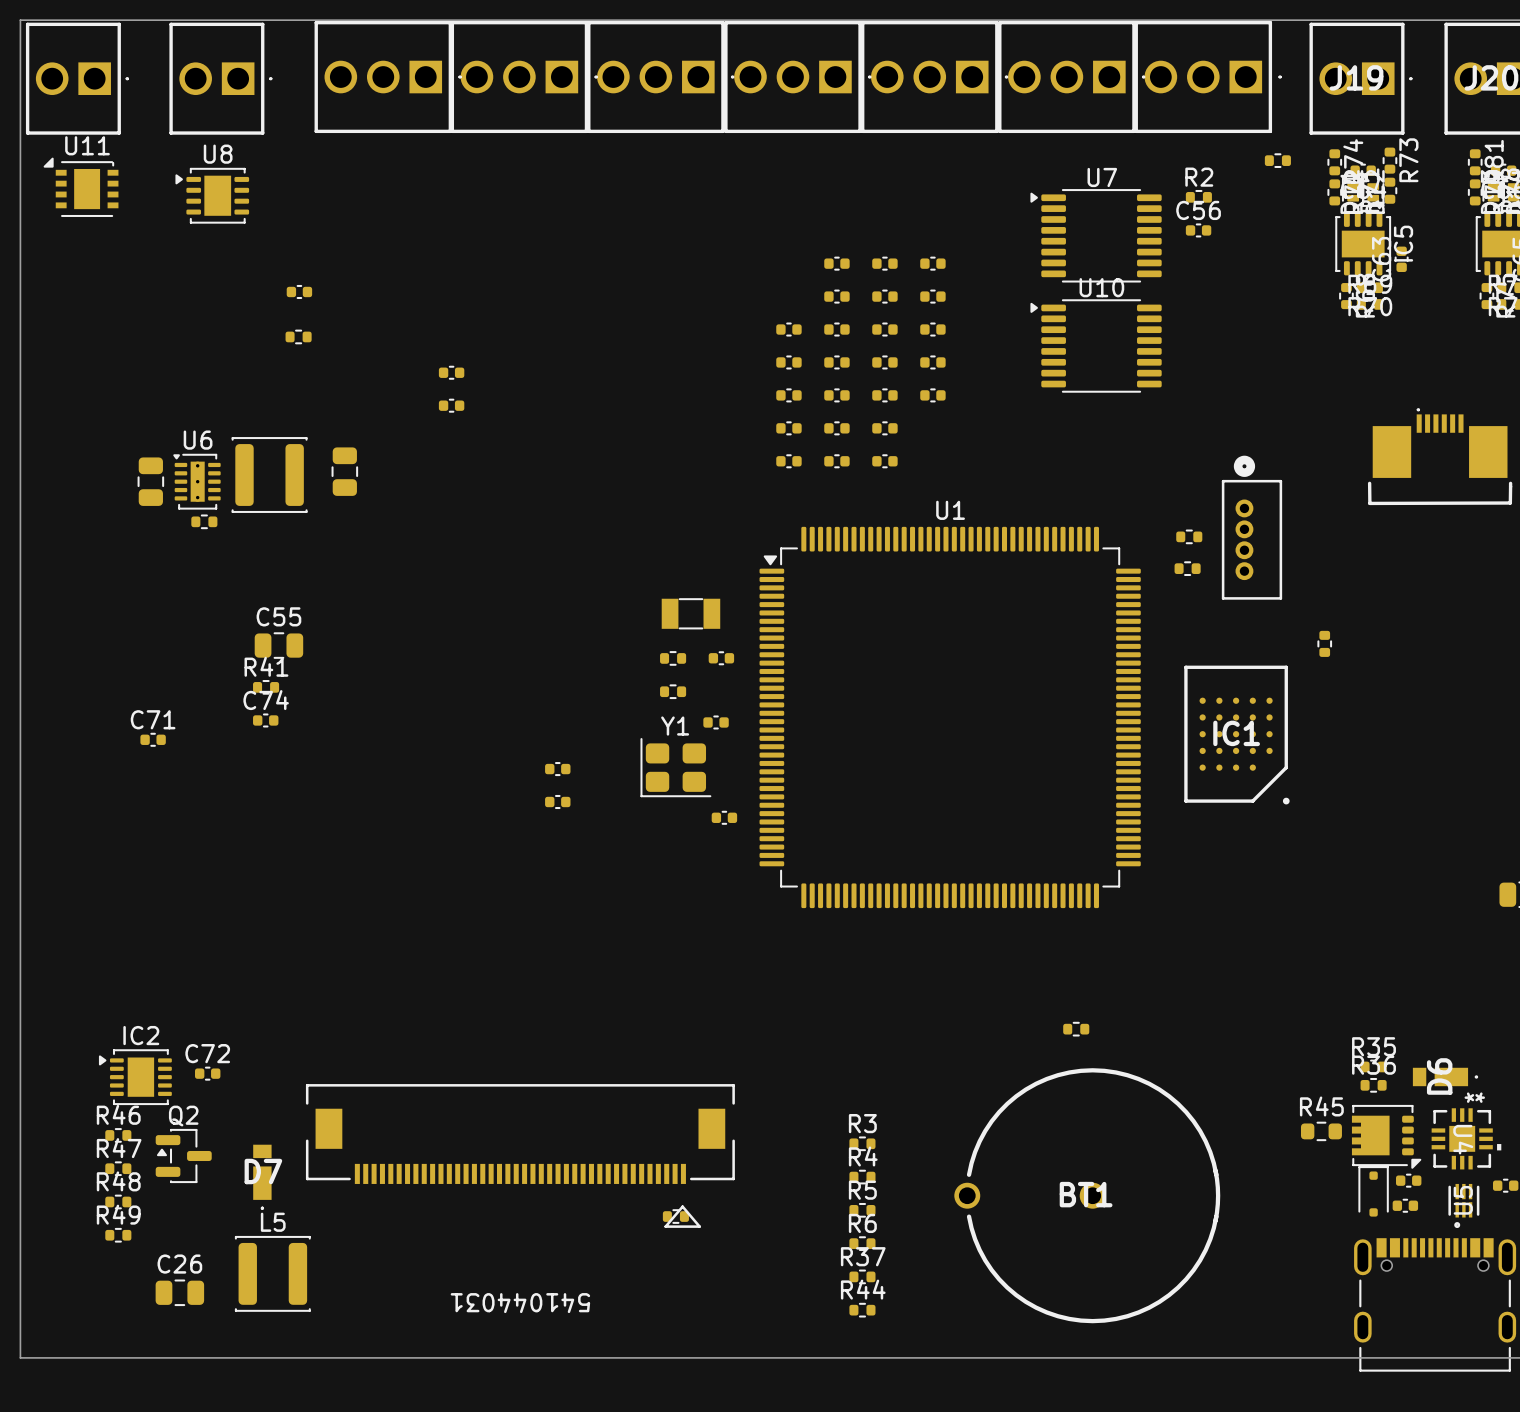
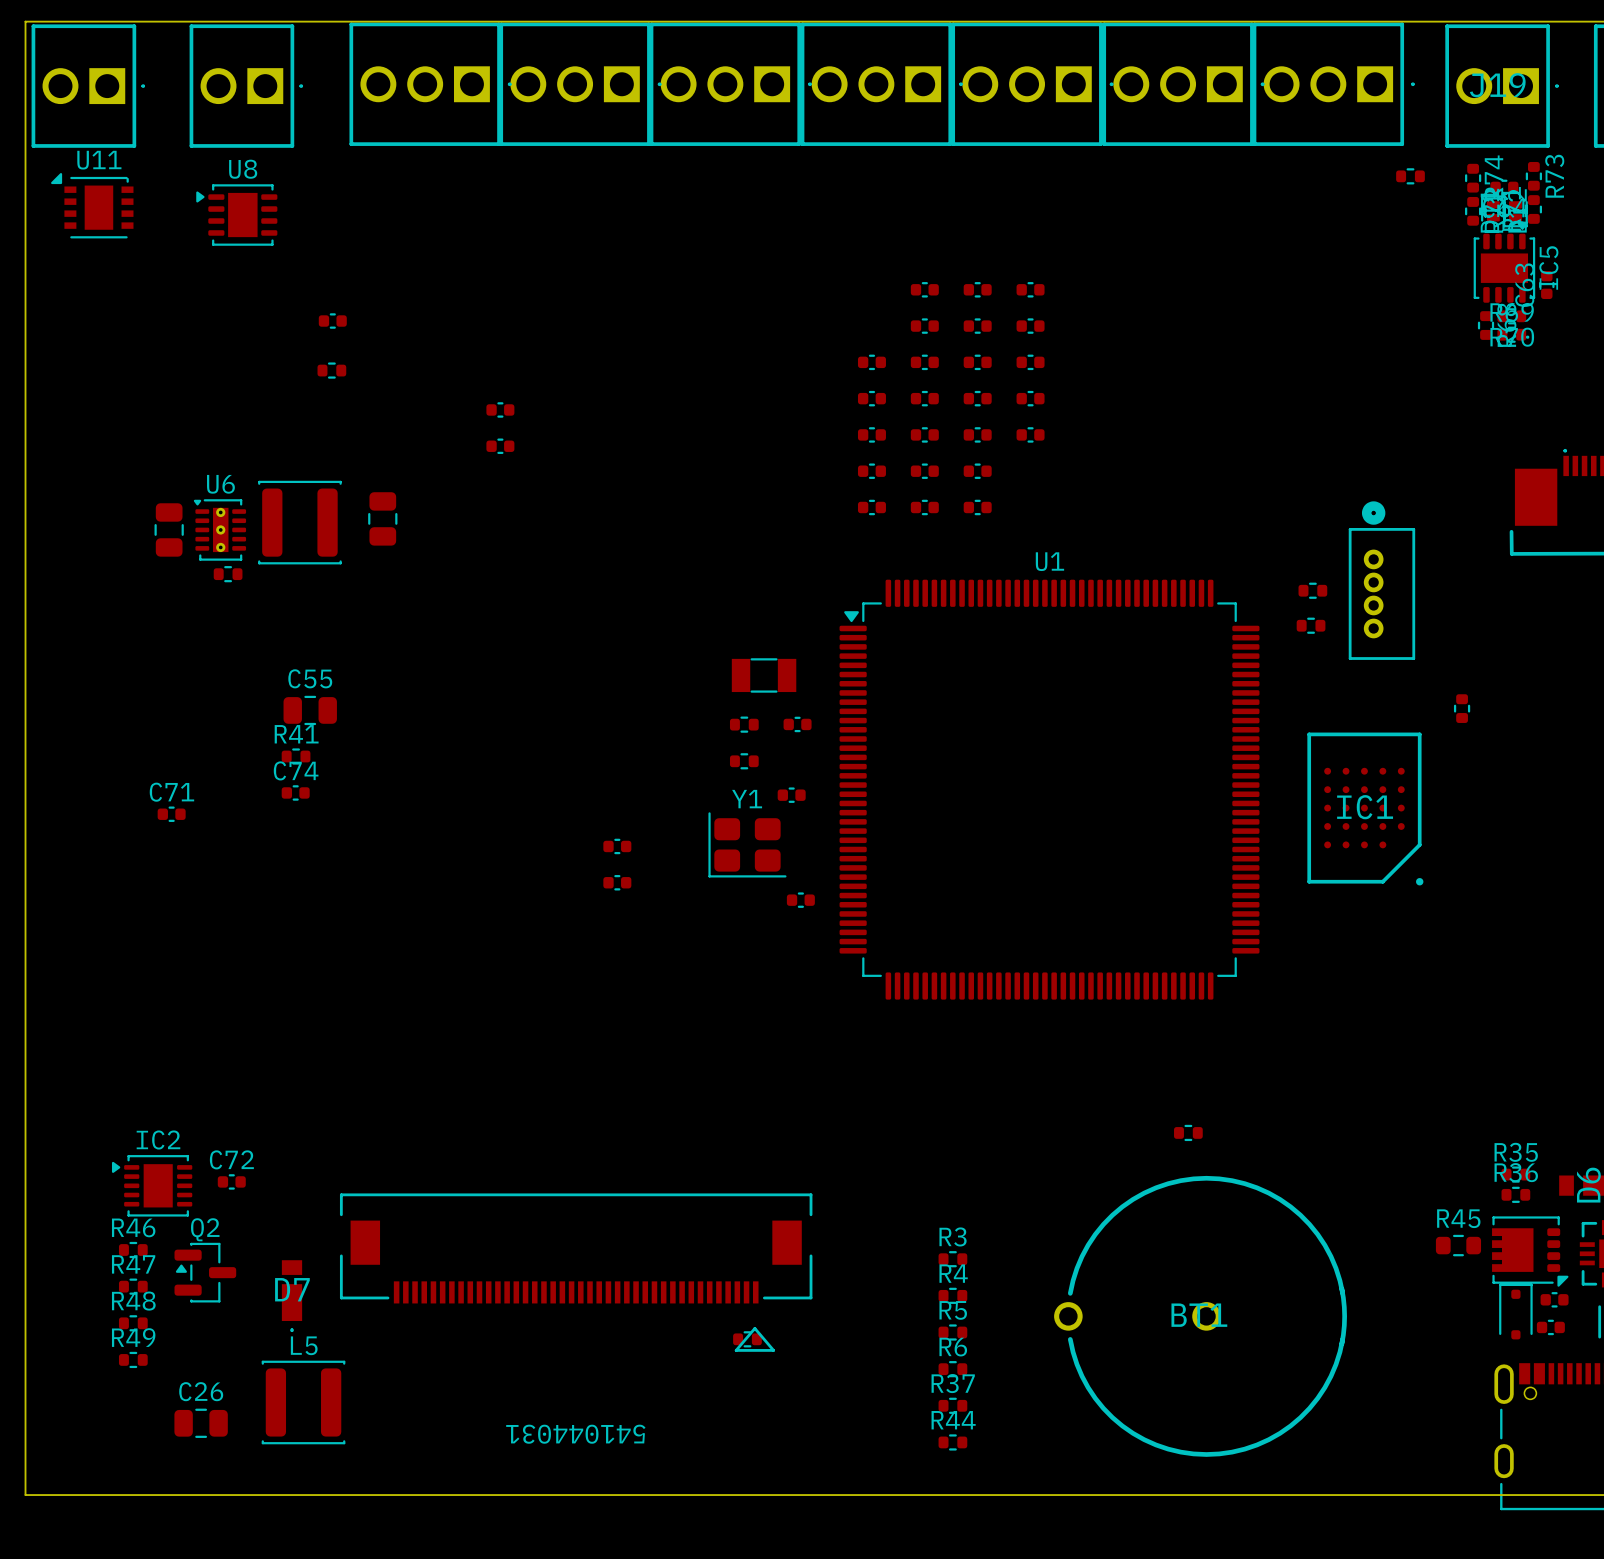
R2: (1198, 197) -> none
C56: (1198, 230) -> none
U7: (1096, 235) -> none
U10: (1096, 345) -> none

